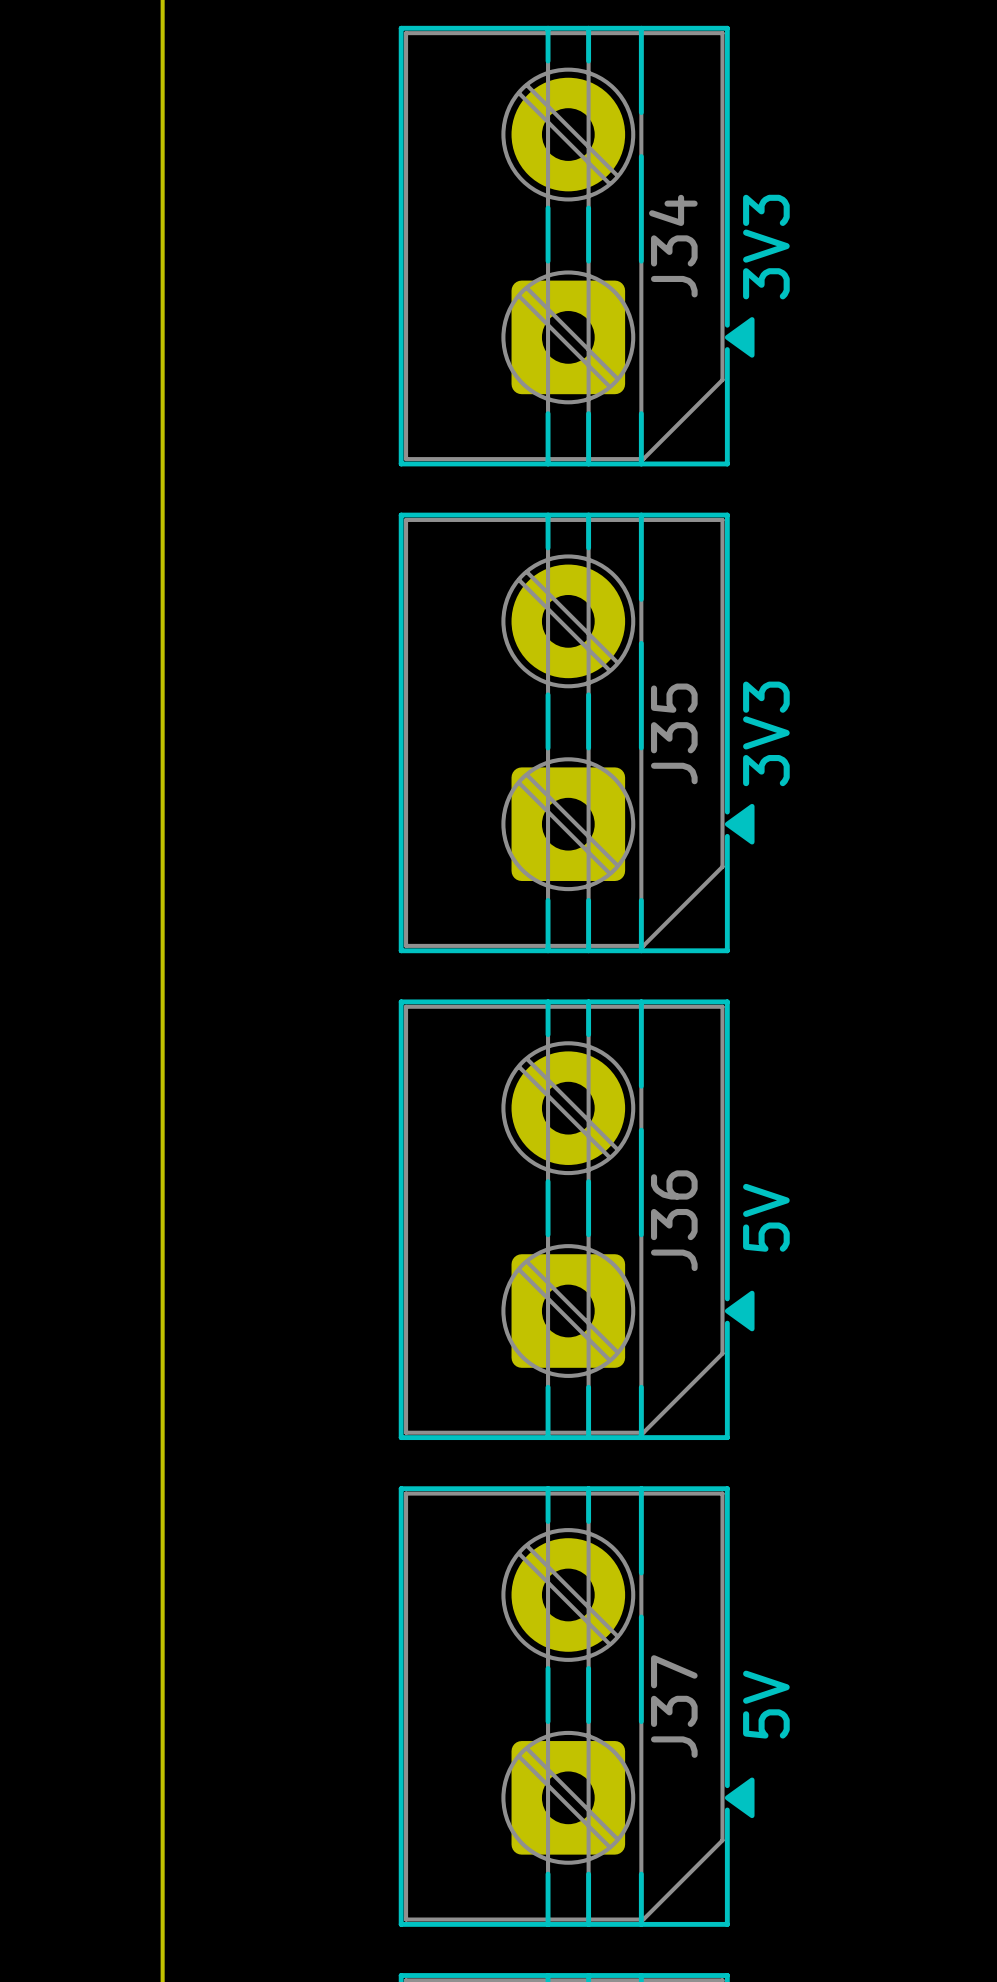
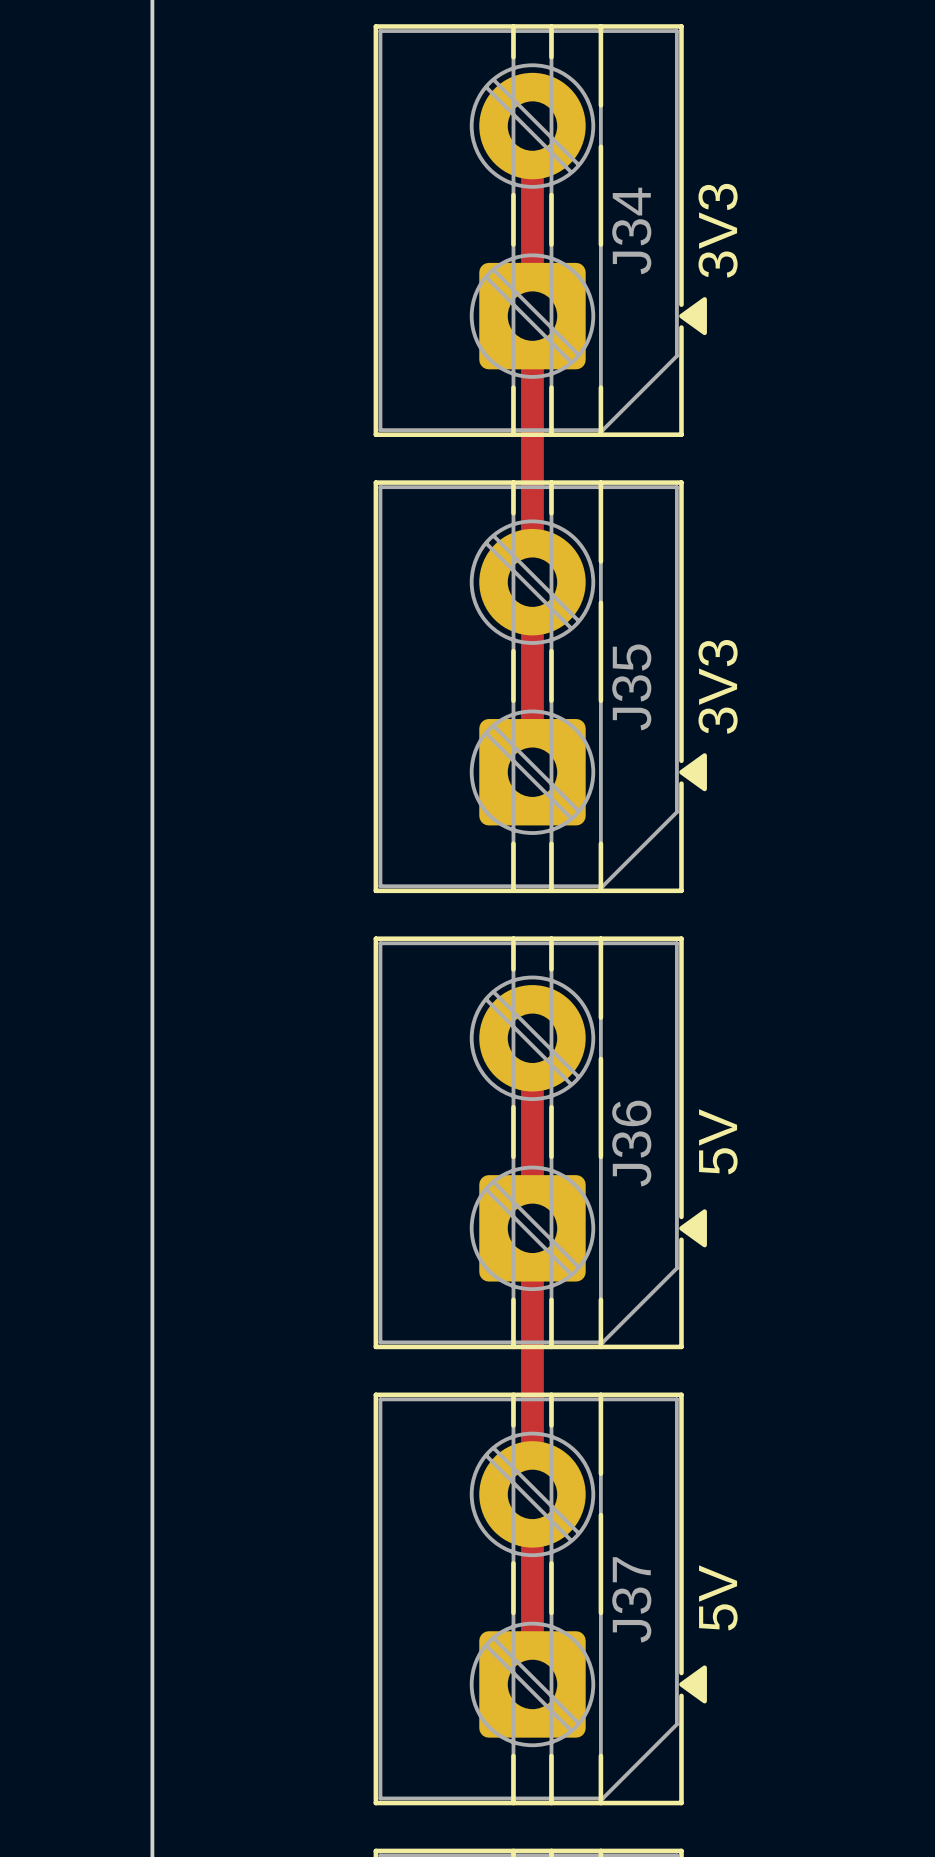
track: none -> (532, 126) (532, 772)
track: none -> (532, 1038) (532, 1684)

